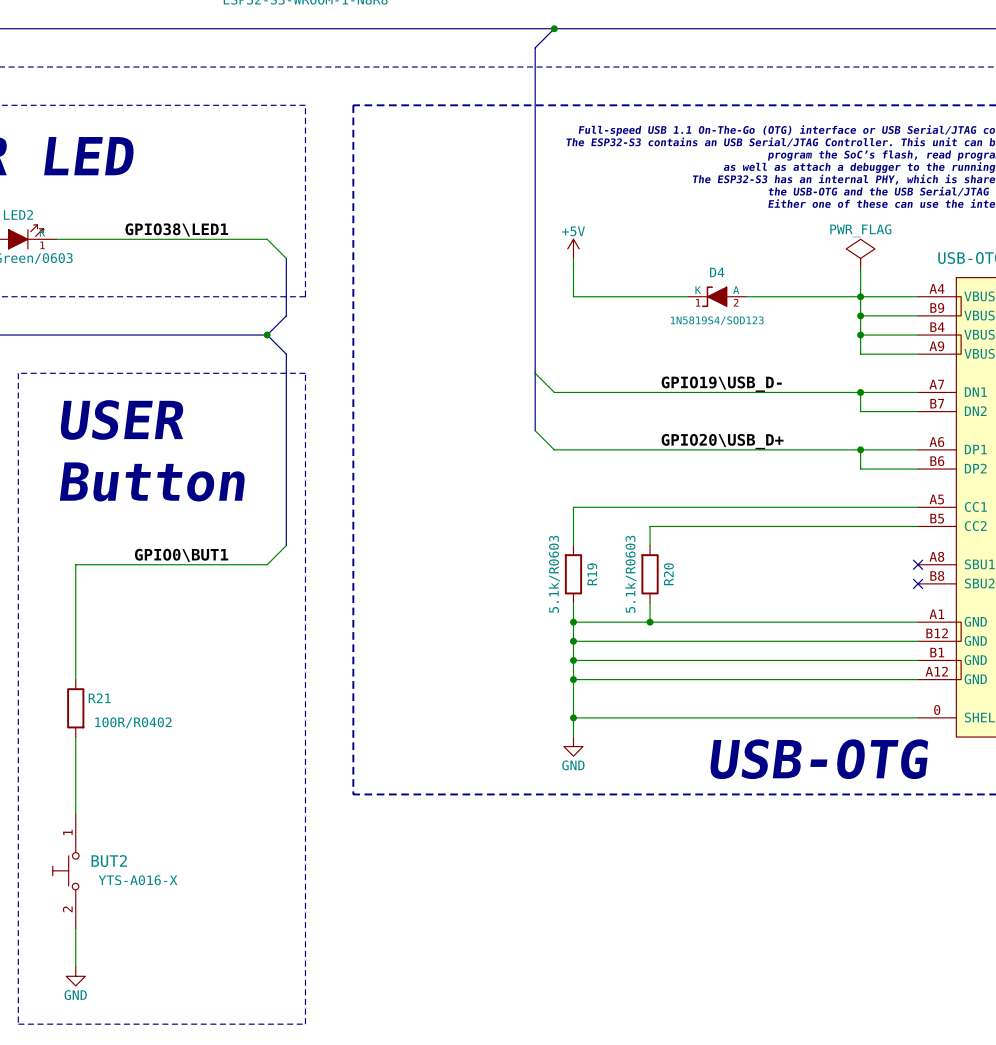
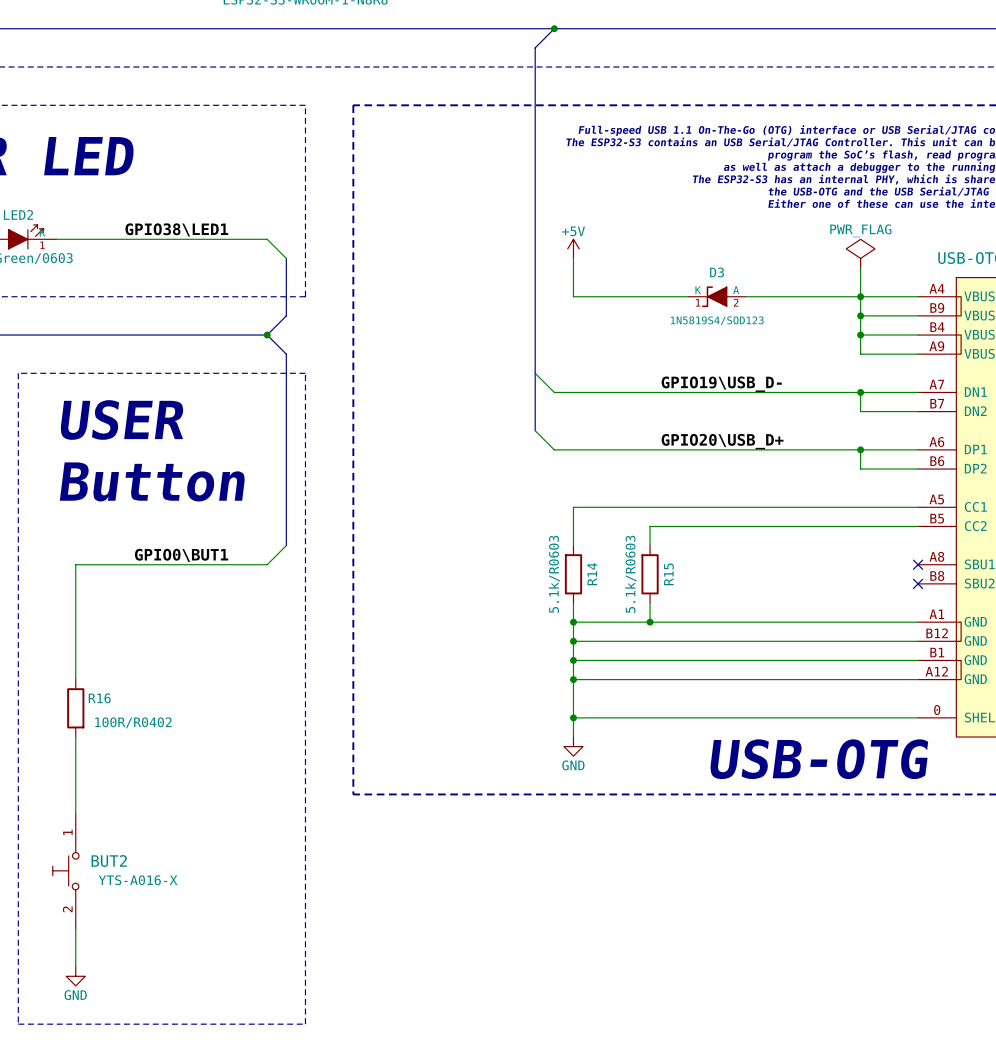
D4 name: D4 (717, 272) -> D3 (716, 272)
R19 name: R19 (592, 574) -> R14 (592, 574)
R20 name: R20 (668, 574) -> R15 (668, 574)
R21 name: R21 (99, 698) -> R16 (99, 698)

